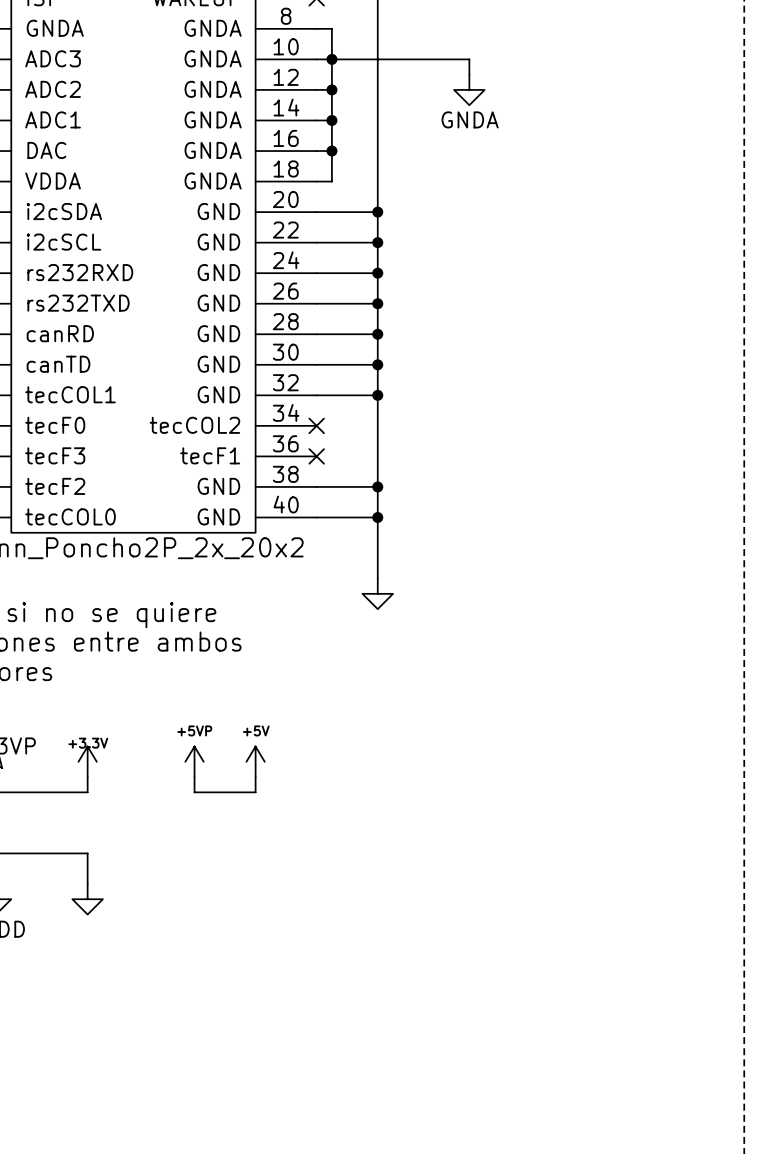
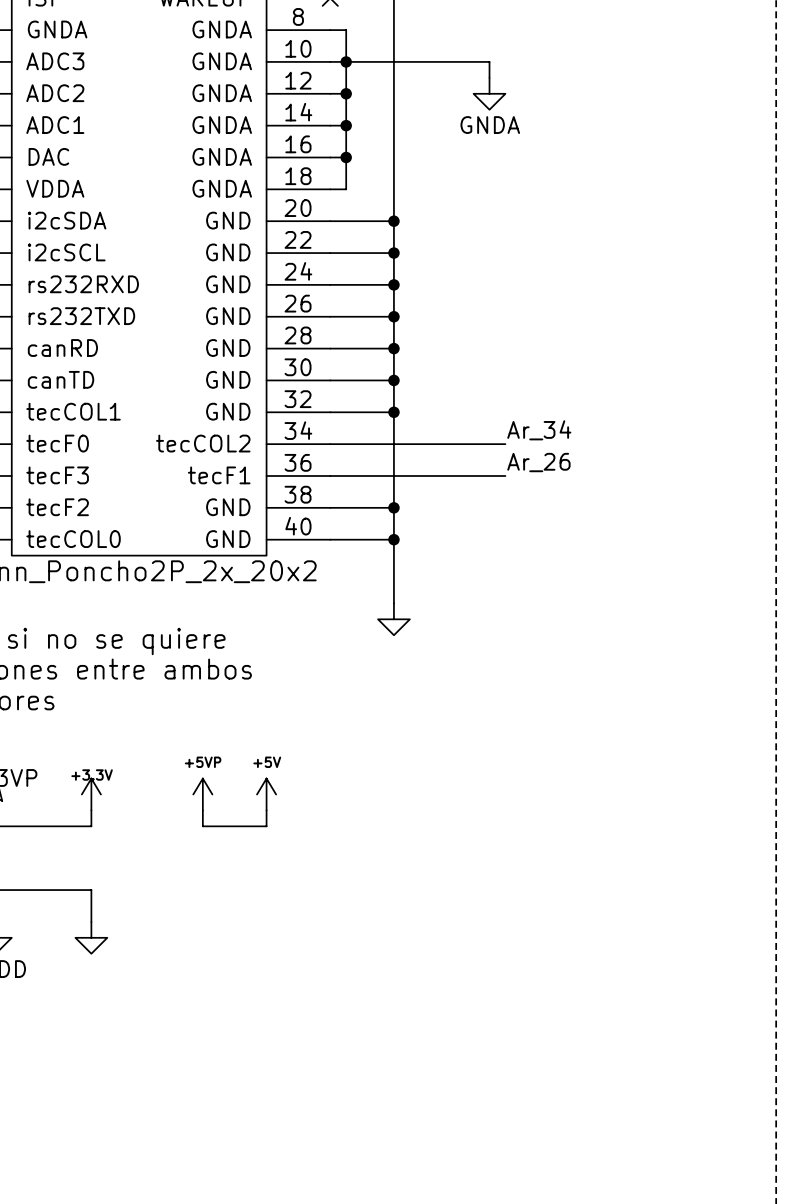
label: none -> Ar_34 (539, 430)
wire: none -> (330, 444) (505, 444)
no-connect mark: (316, 425) -> none
label: none -> Ar_26 (538, 462)
wire: none -> (330, 475) (505, 475)
no-connect mark: (316, 456) -> none

